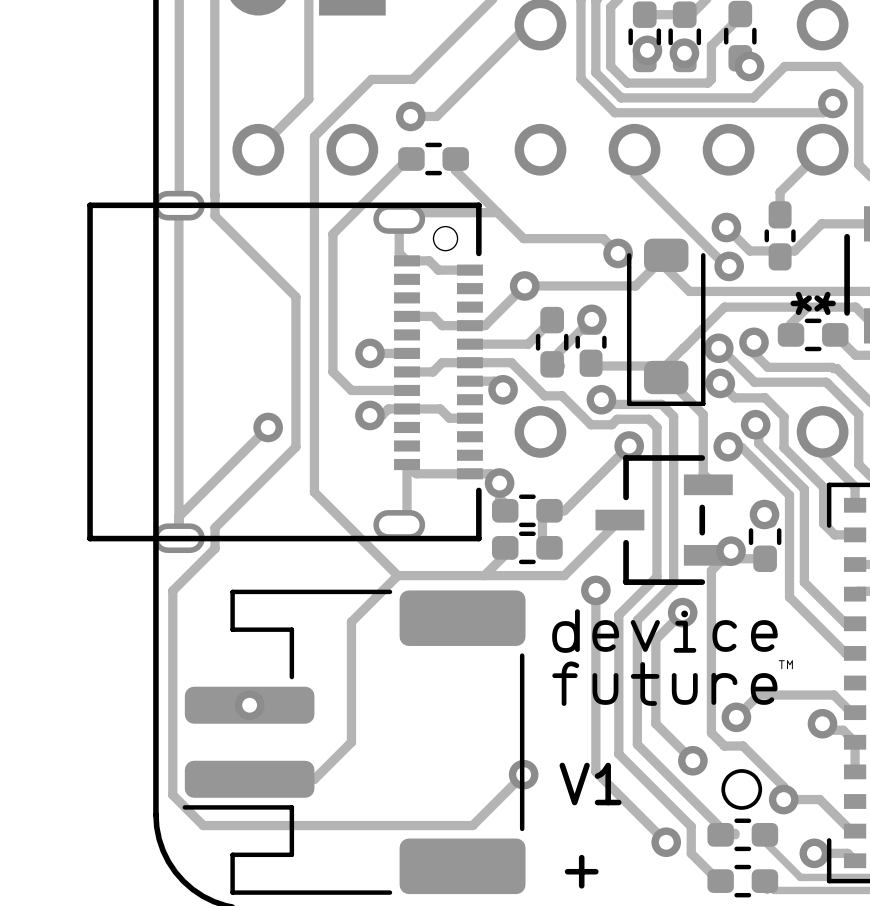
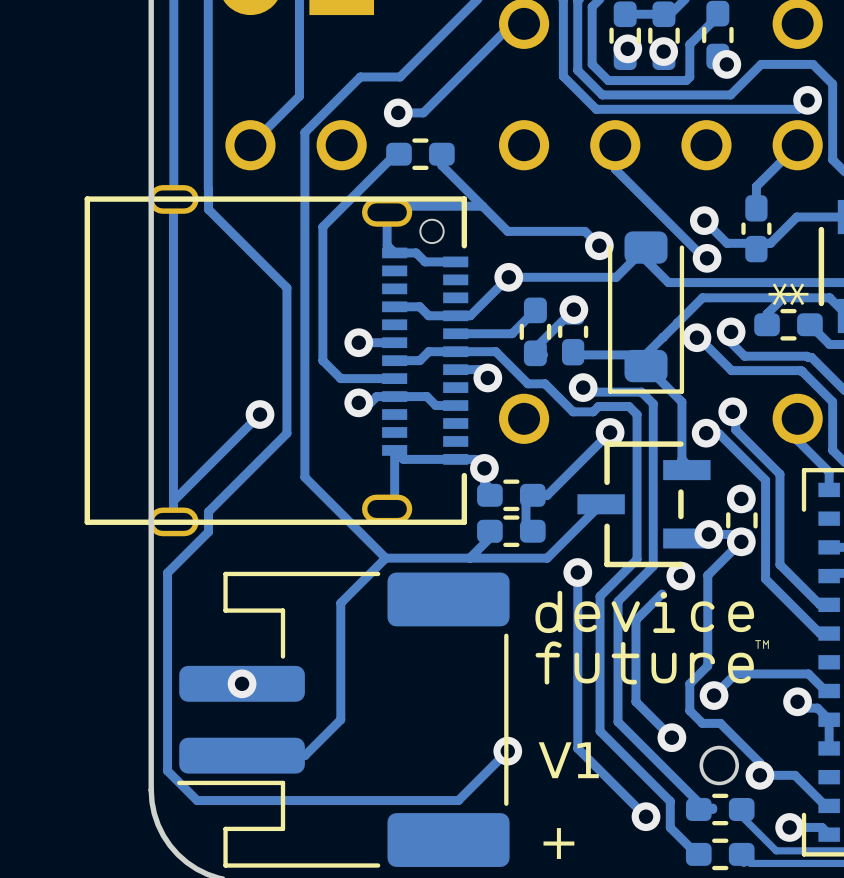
track: (720, 383) (734, 397) (765, 397) (784, 416) (784, 447) (823, 487) (823, 523) (834, 534) (855, 534) -> none
via: (720, 383) -> none
track: (764, 558) (738, 558) (731, 551) (711, 570) (711, 705) -> (708, 534) (733, 534) (741, 541) (707, 575) (707, 665) (689, 683)
via: none -> (741, 541)
via position: (682, 612) -> (680, 576)

